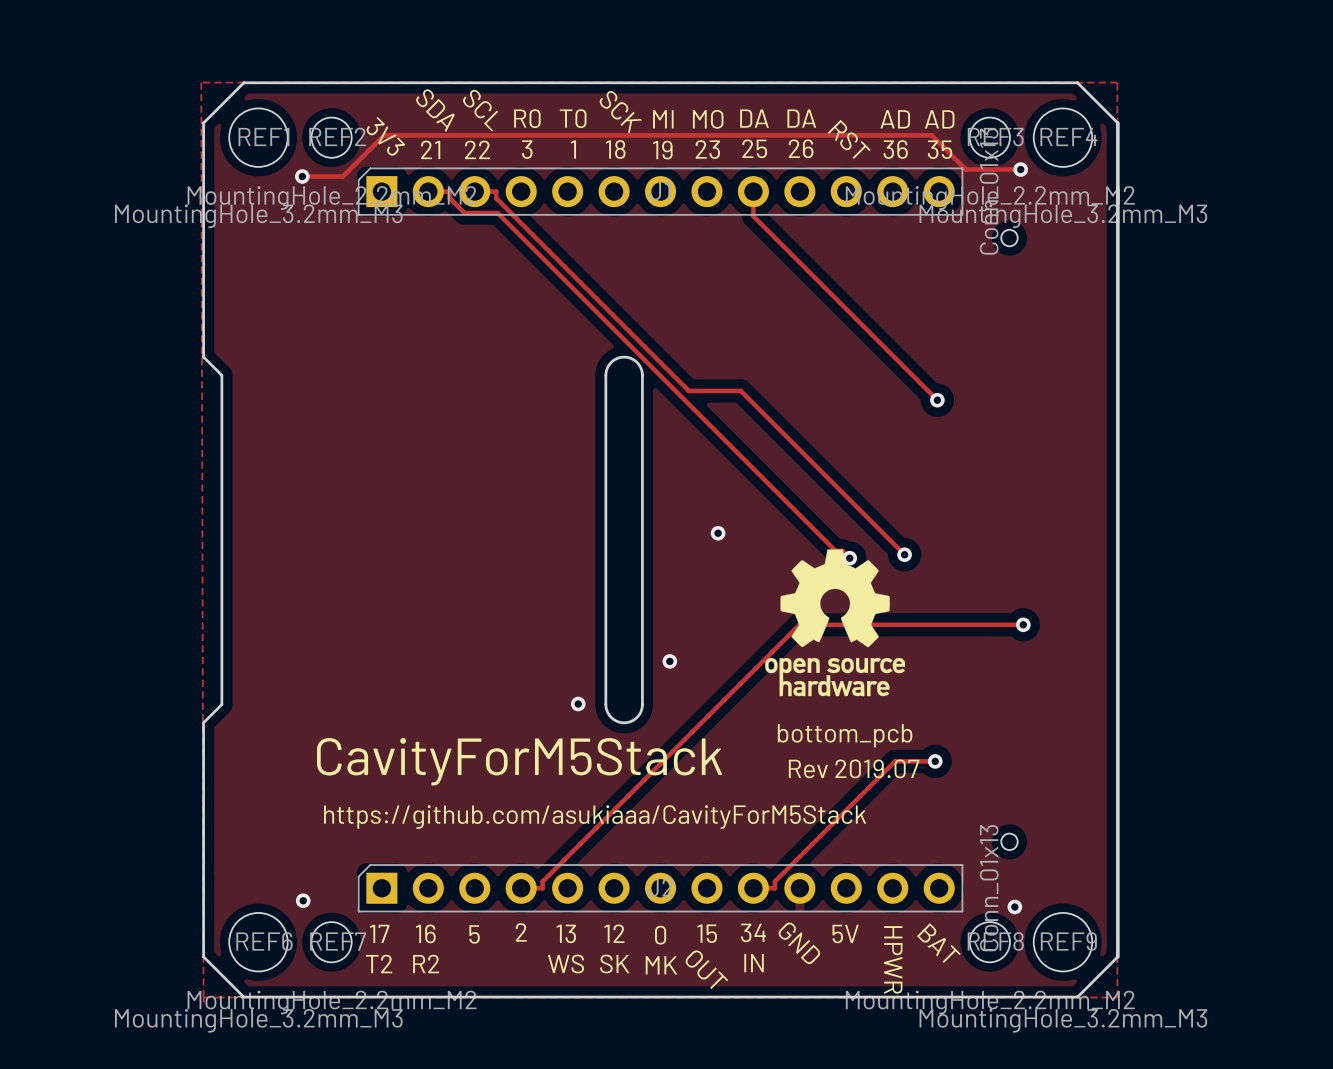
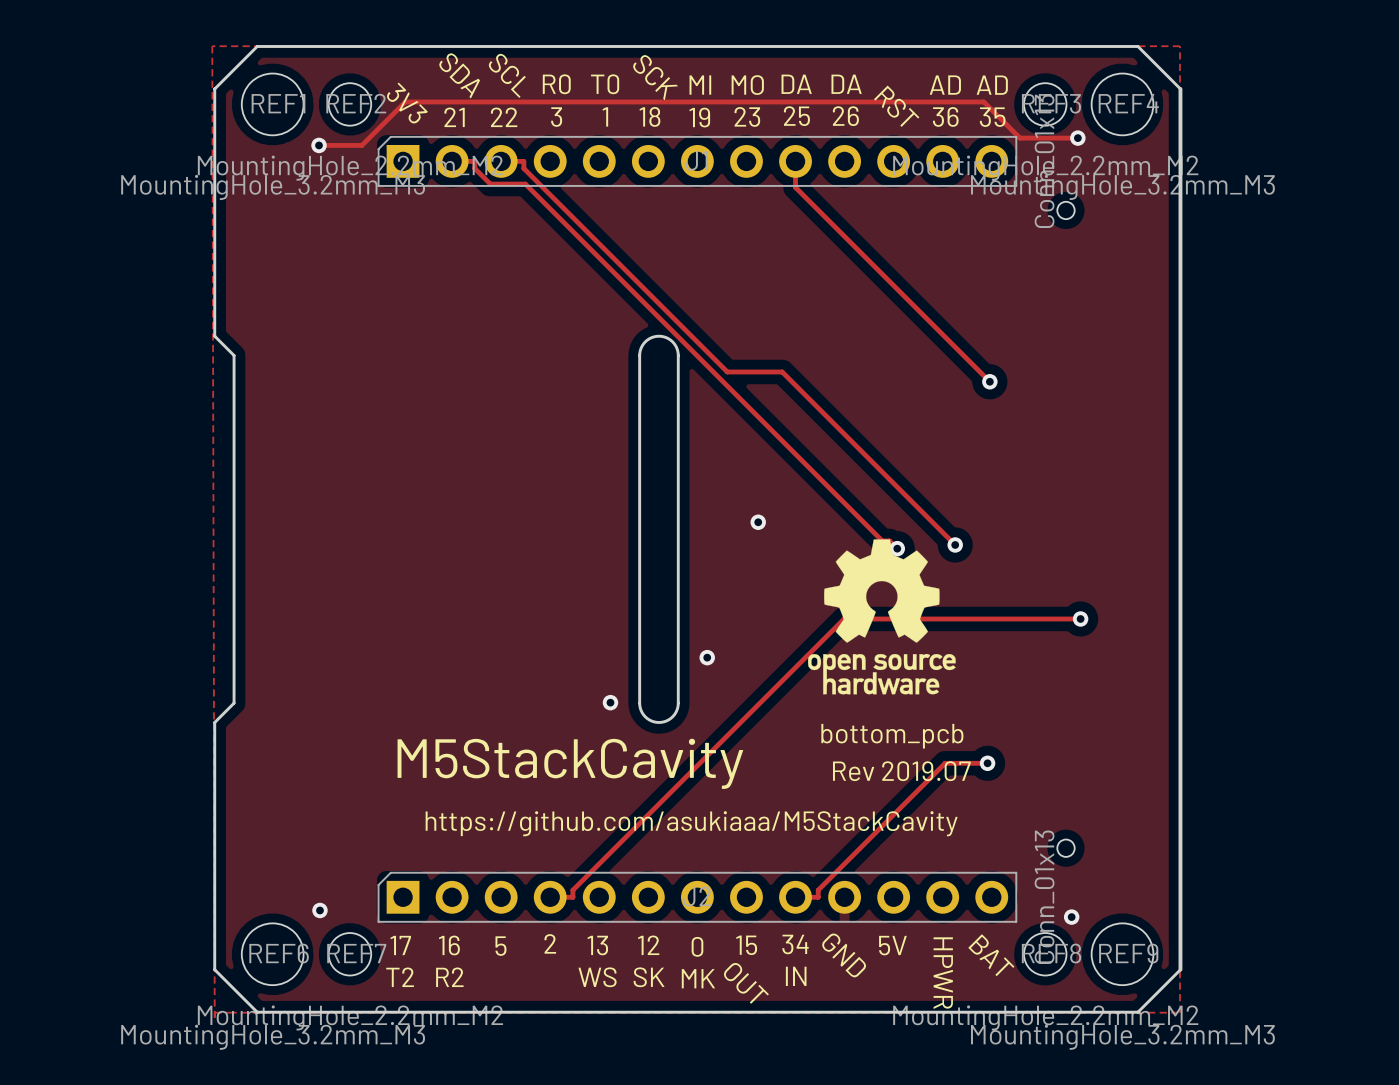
text: CavityForM5Stack (519, 761) -> none
text: none -> M5StackCavity (570, 763)
text: https://github.com/asukiaaa/CavityForM5Stack (595, 817) -> https://github.com/asukiaaa/M5StackCavity (691, 823)

